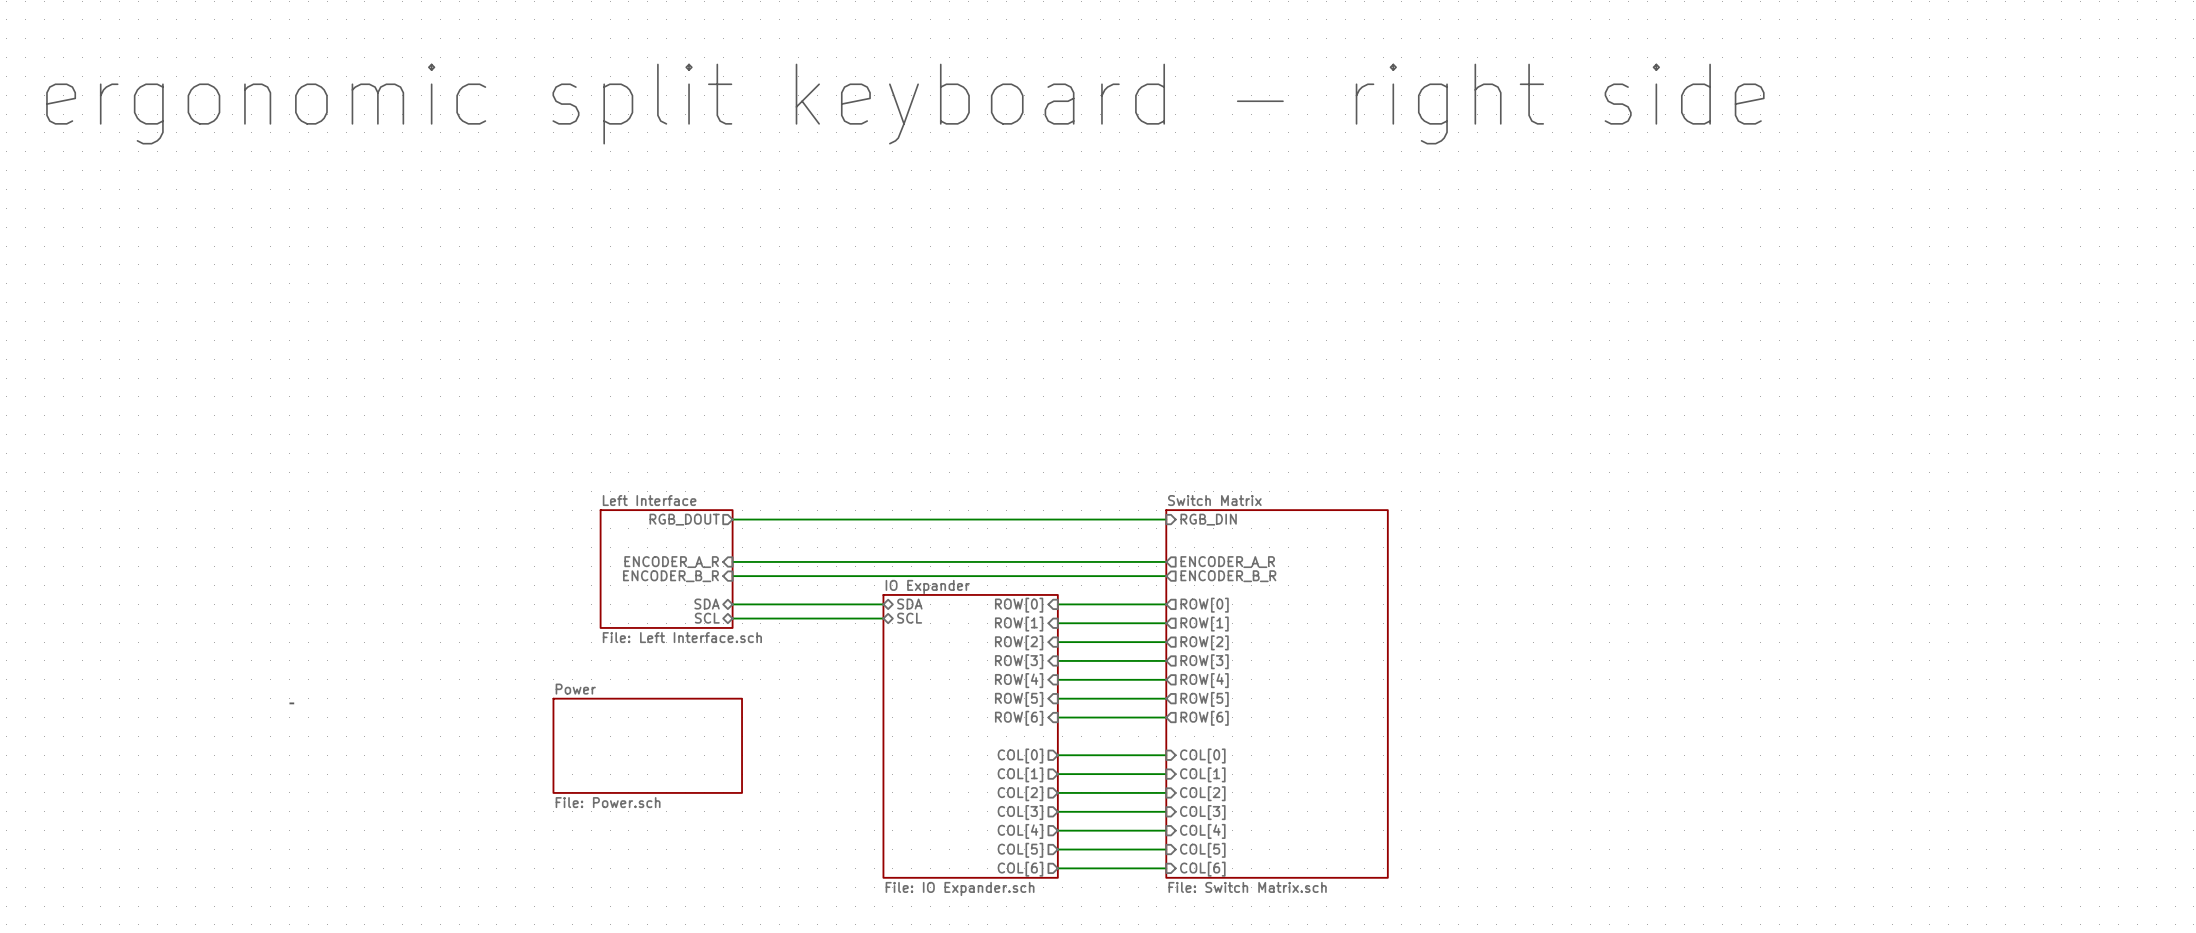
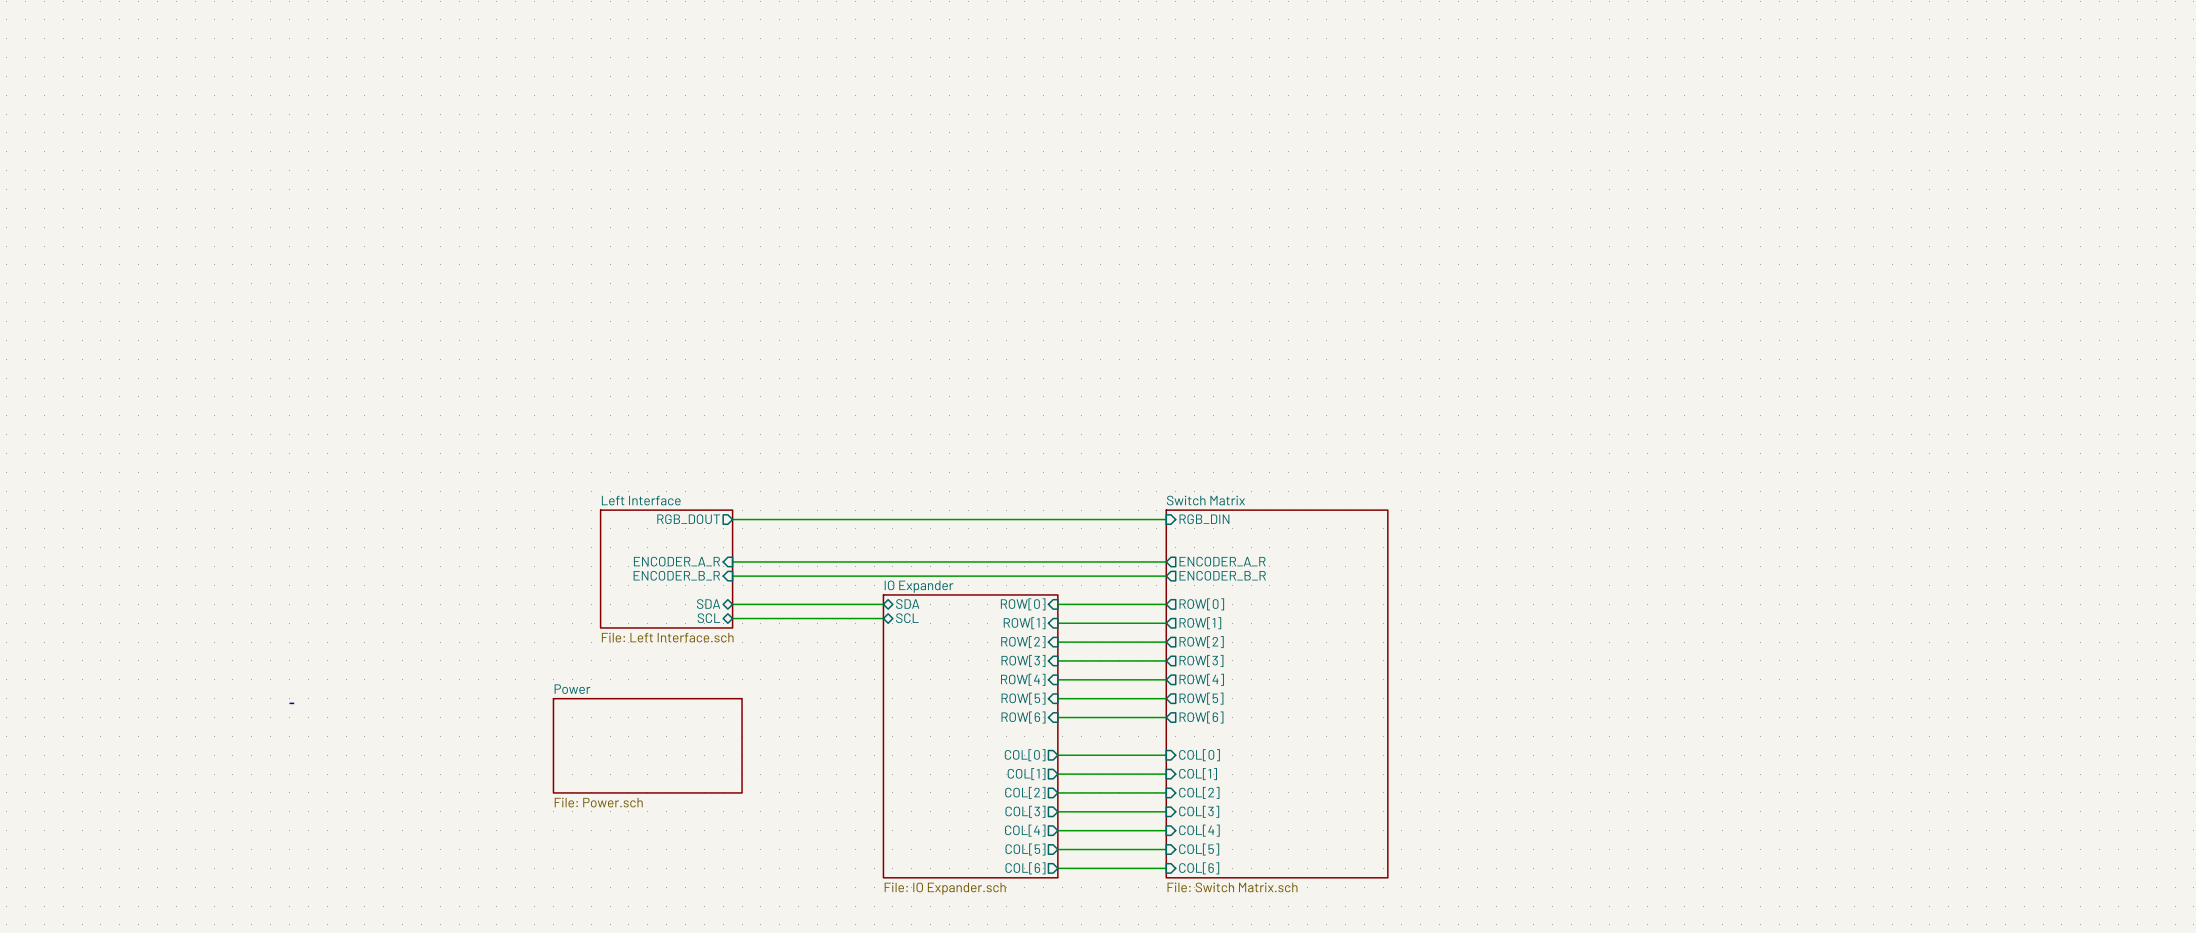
text: ergonomic split keyboard - right side (905, 104) -> none

